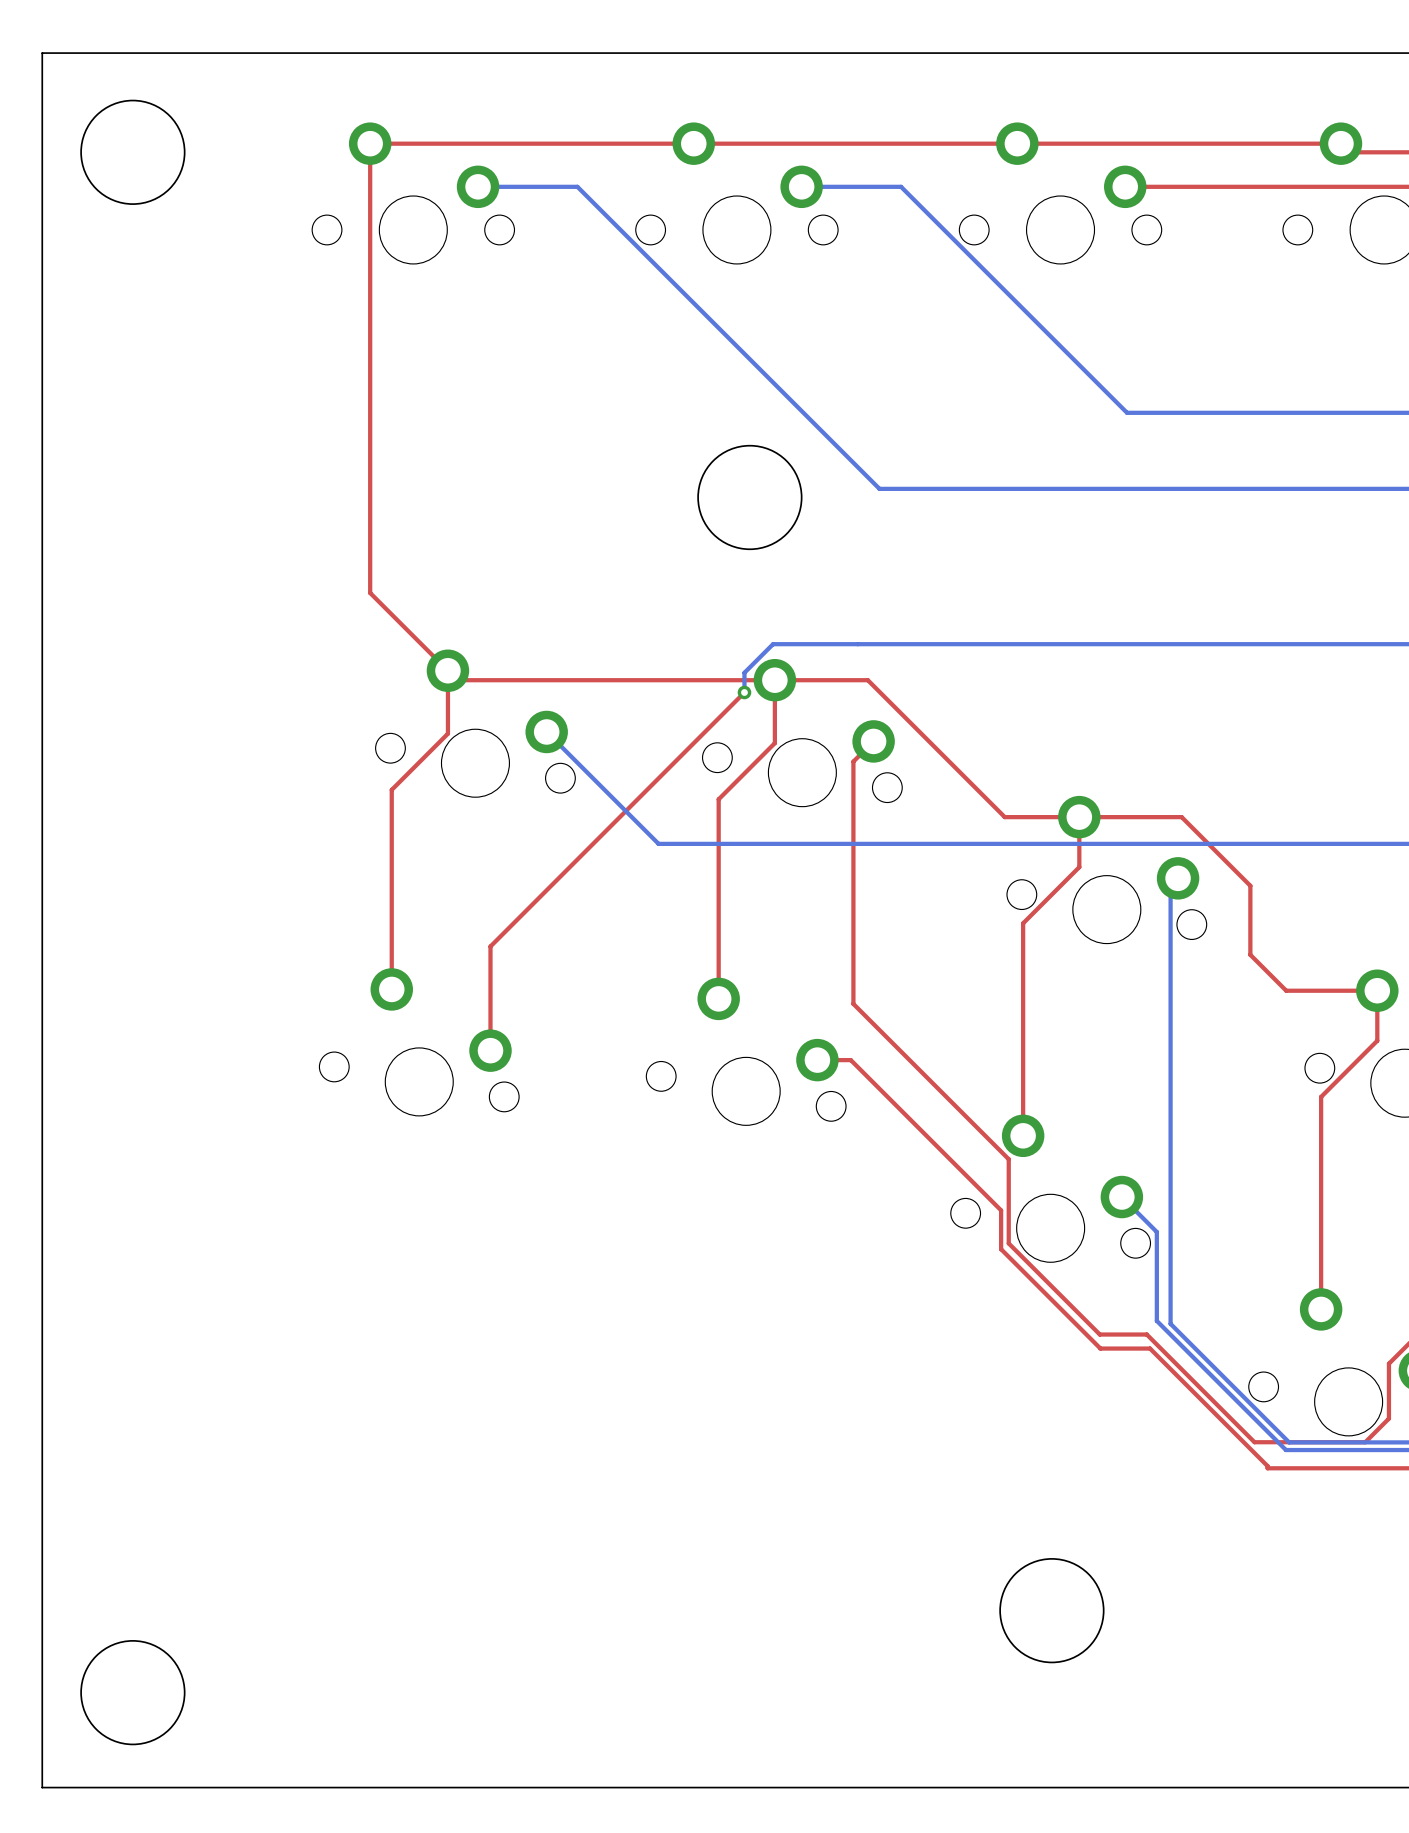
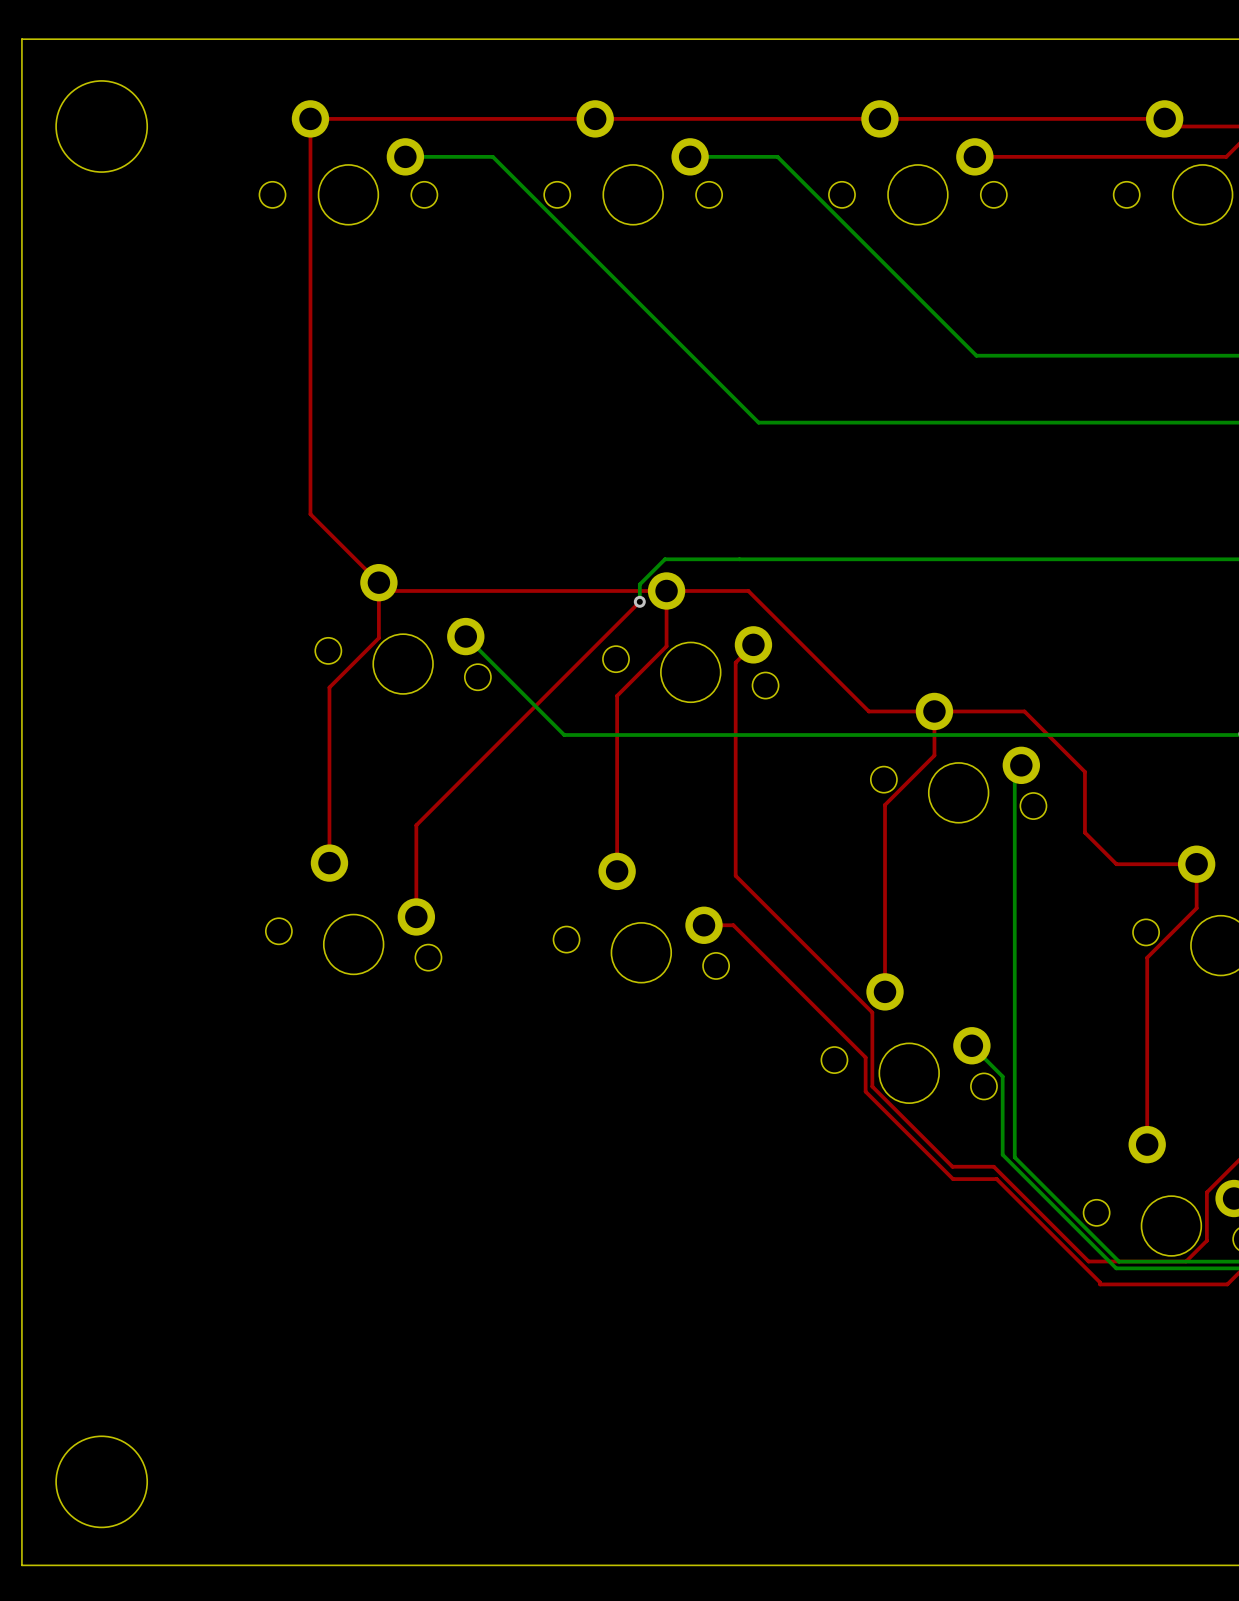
round board edge: [697, 444, 803, 551] -> none
round board edge: [999, 1558, 1105, 1664] -> none

